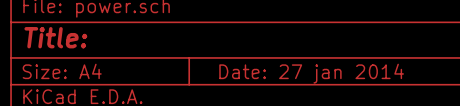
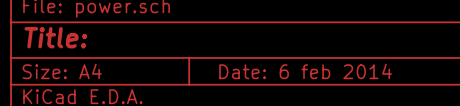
title block: Date: 27 jan 2014 (311, 73) -> Date: 6 feb 2014 (305, 71)

